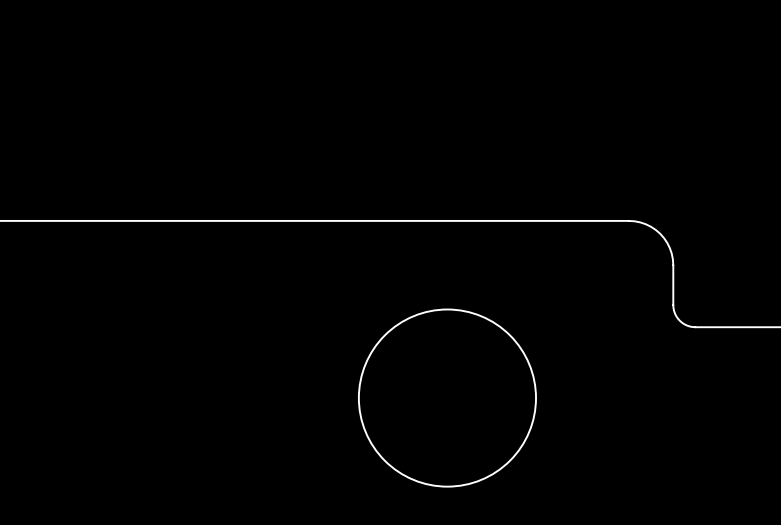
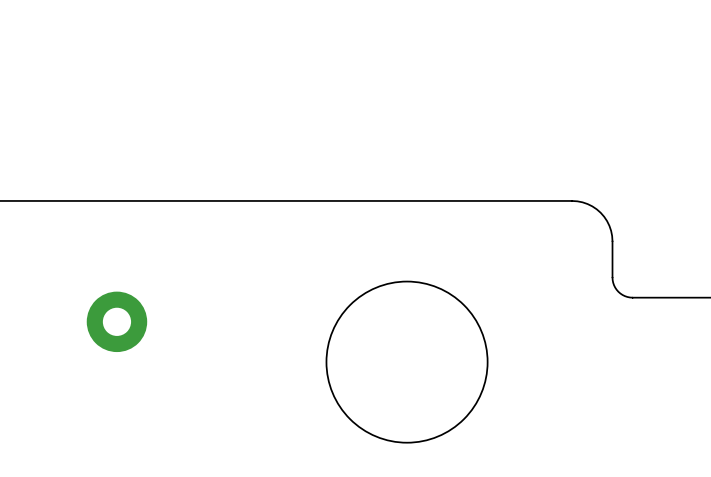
via: none -> (116, 321)

